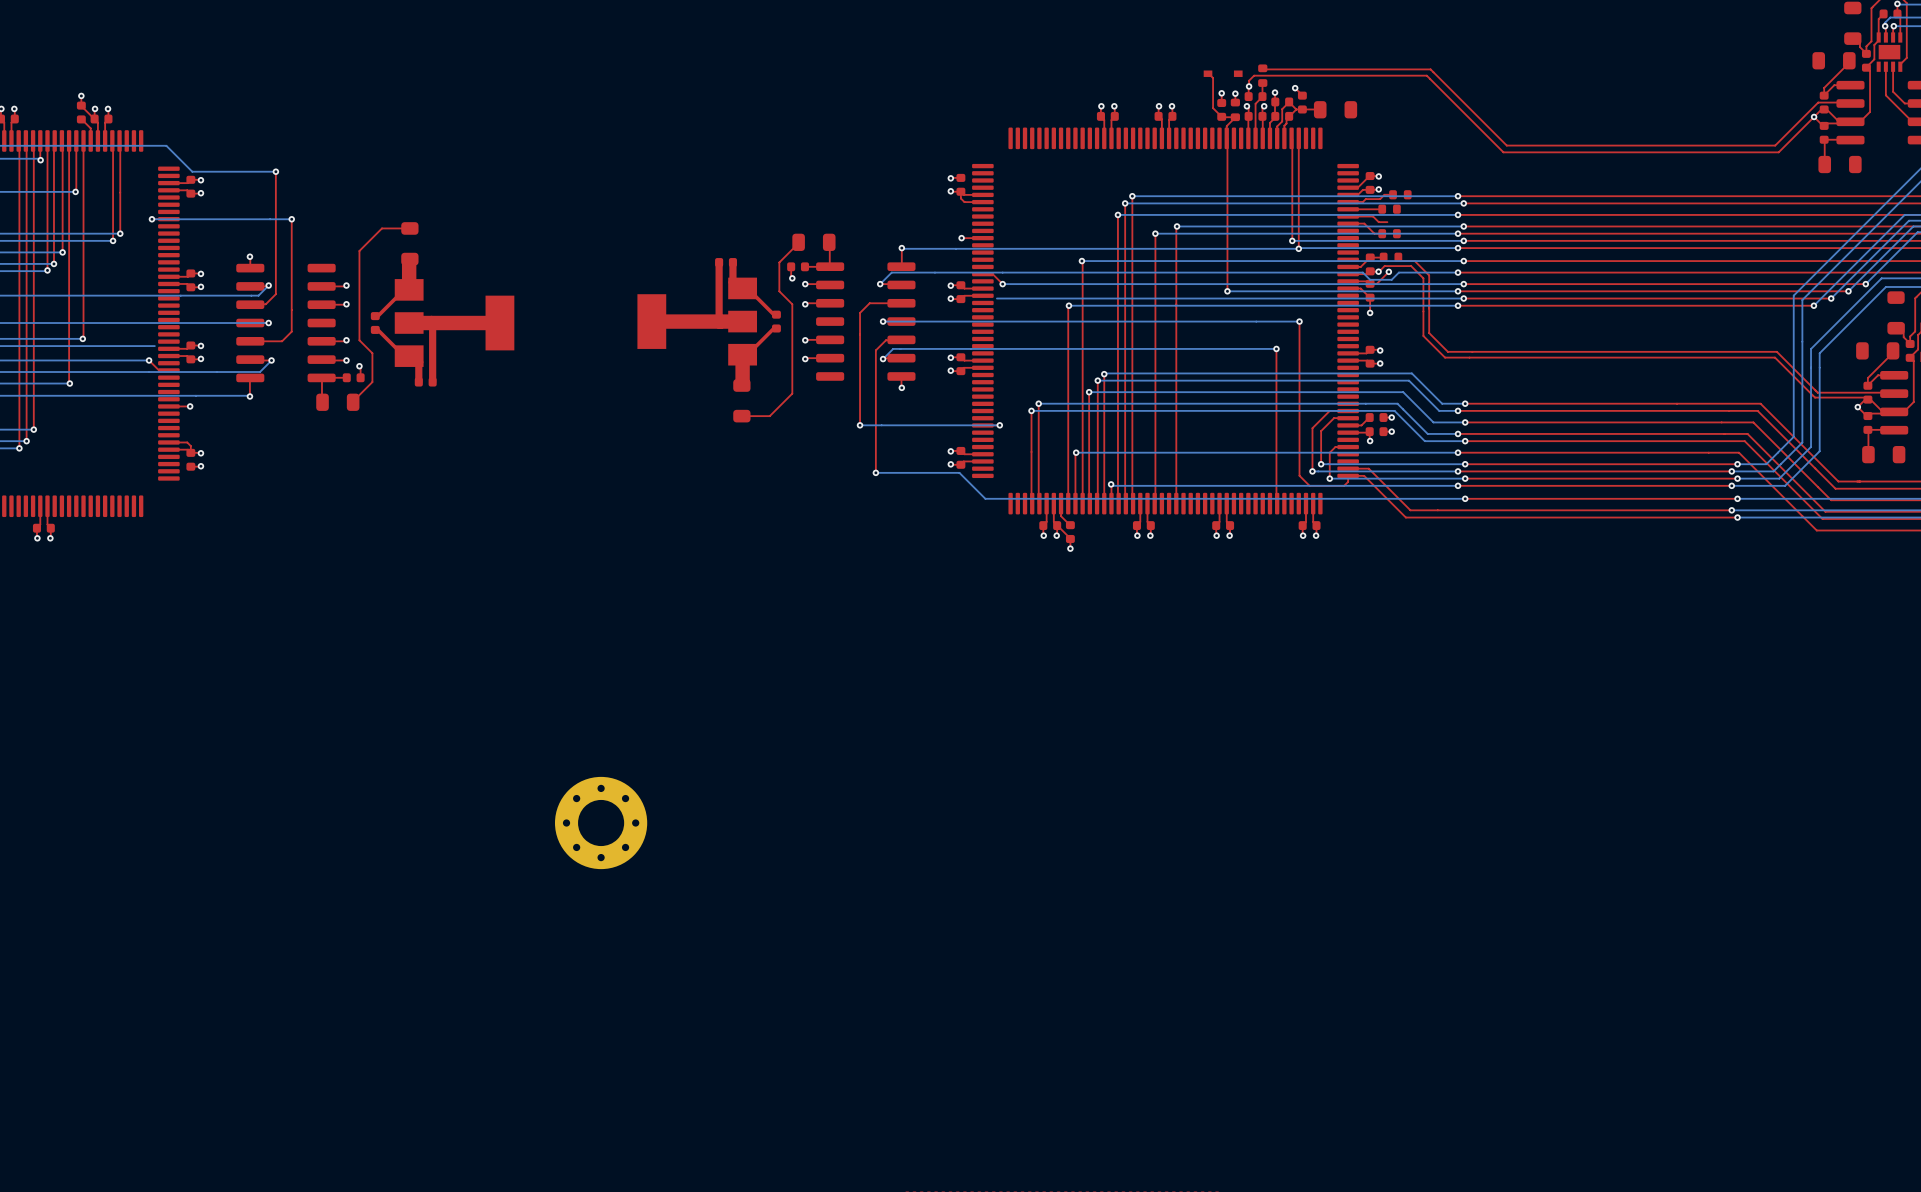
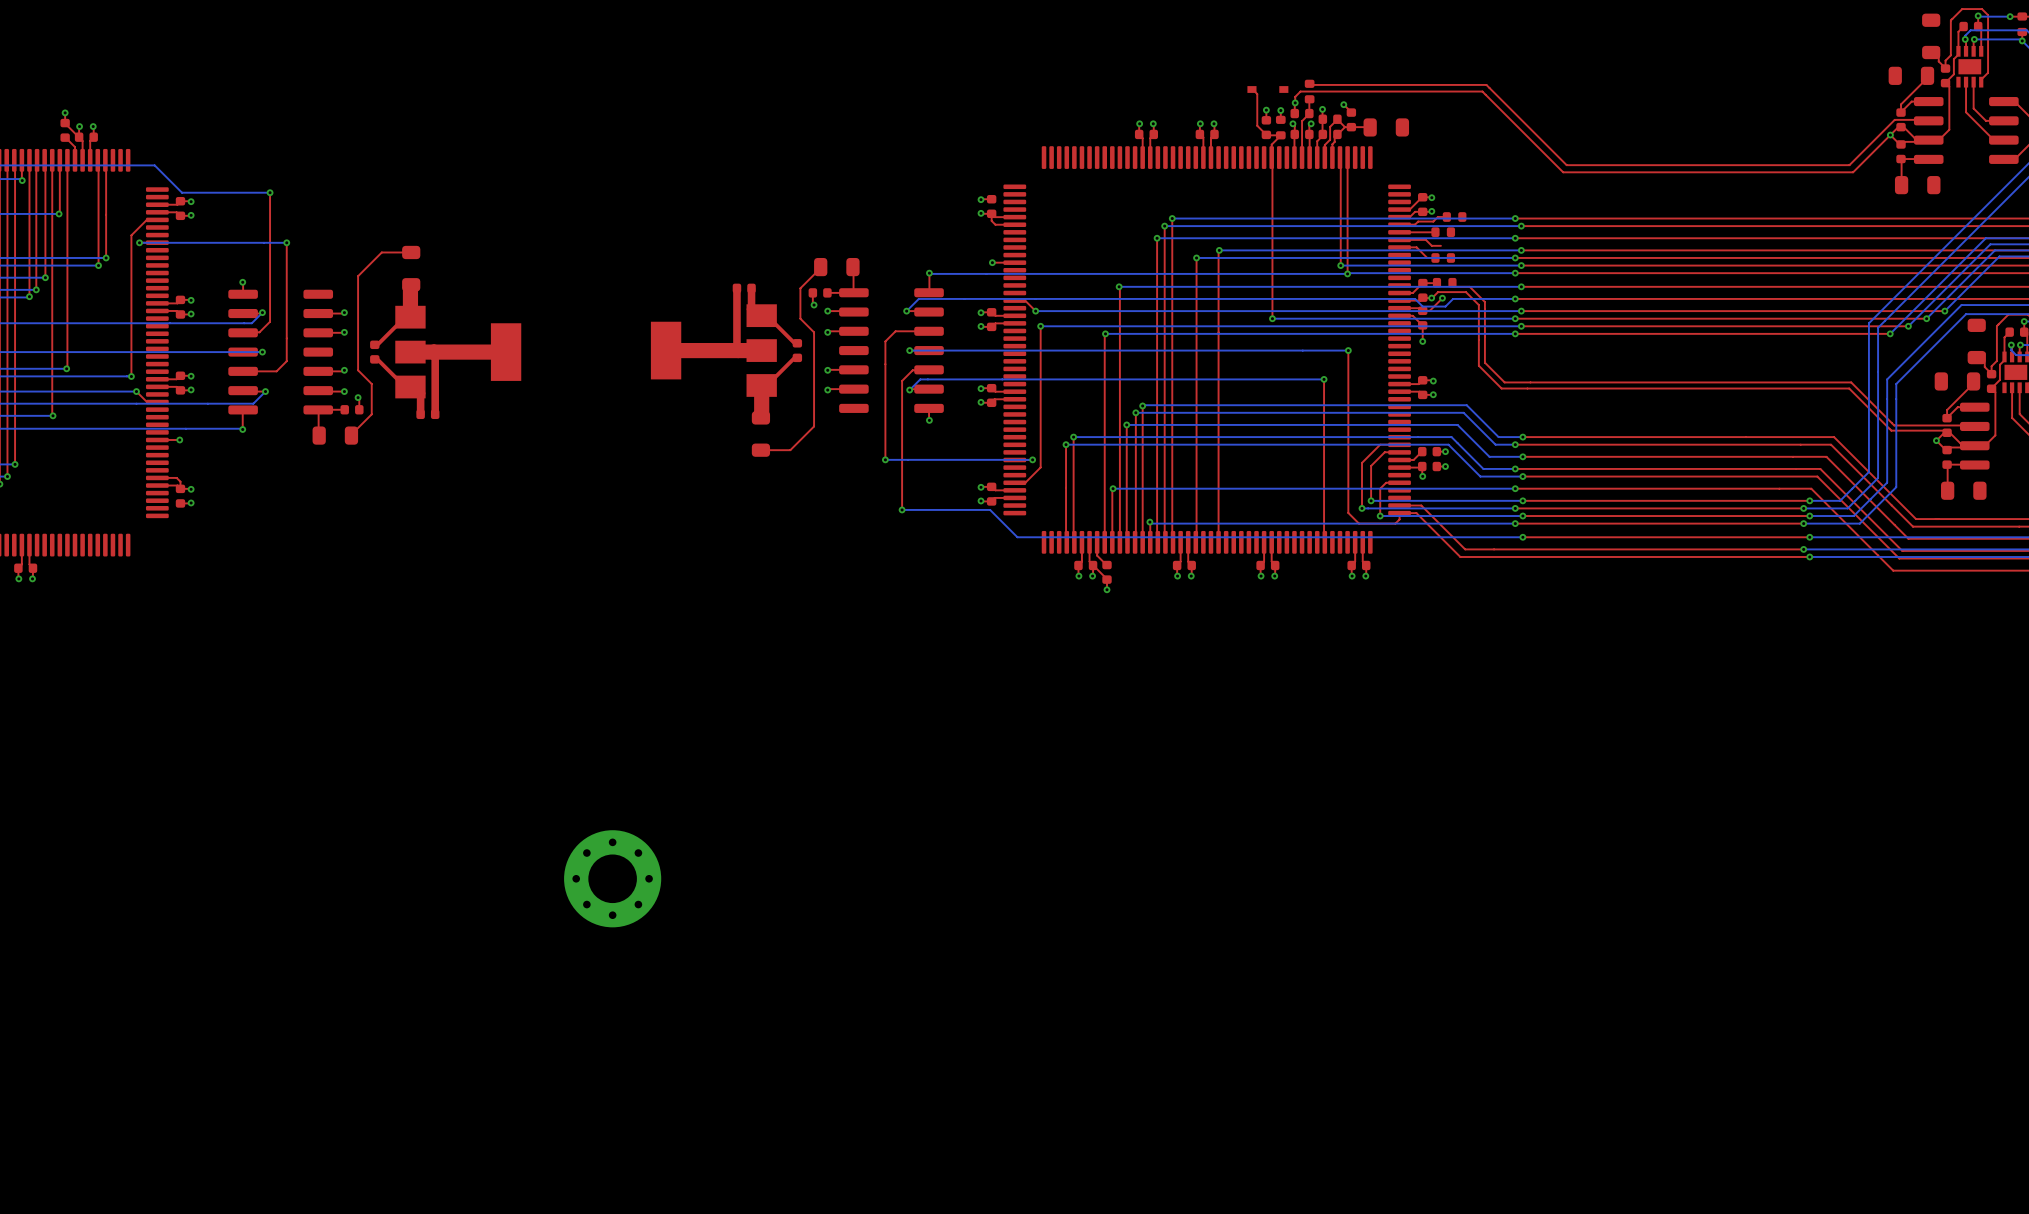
top track: none -> (157, 220) (146, 220) (131, 235) (131, 376)
top track: none -> (1040, 326) (1040, 467) (1025, 482) (1014, 482)
bottom track: (1007, 298) (996, 298) -> none
via: none -> (1040, 326)
via: none -> (131, 376)
bottom track: (154, 346) (144, 346) -> none

